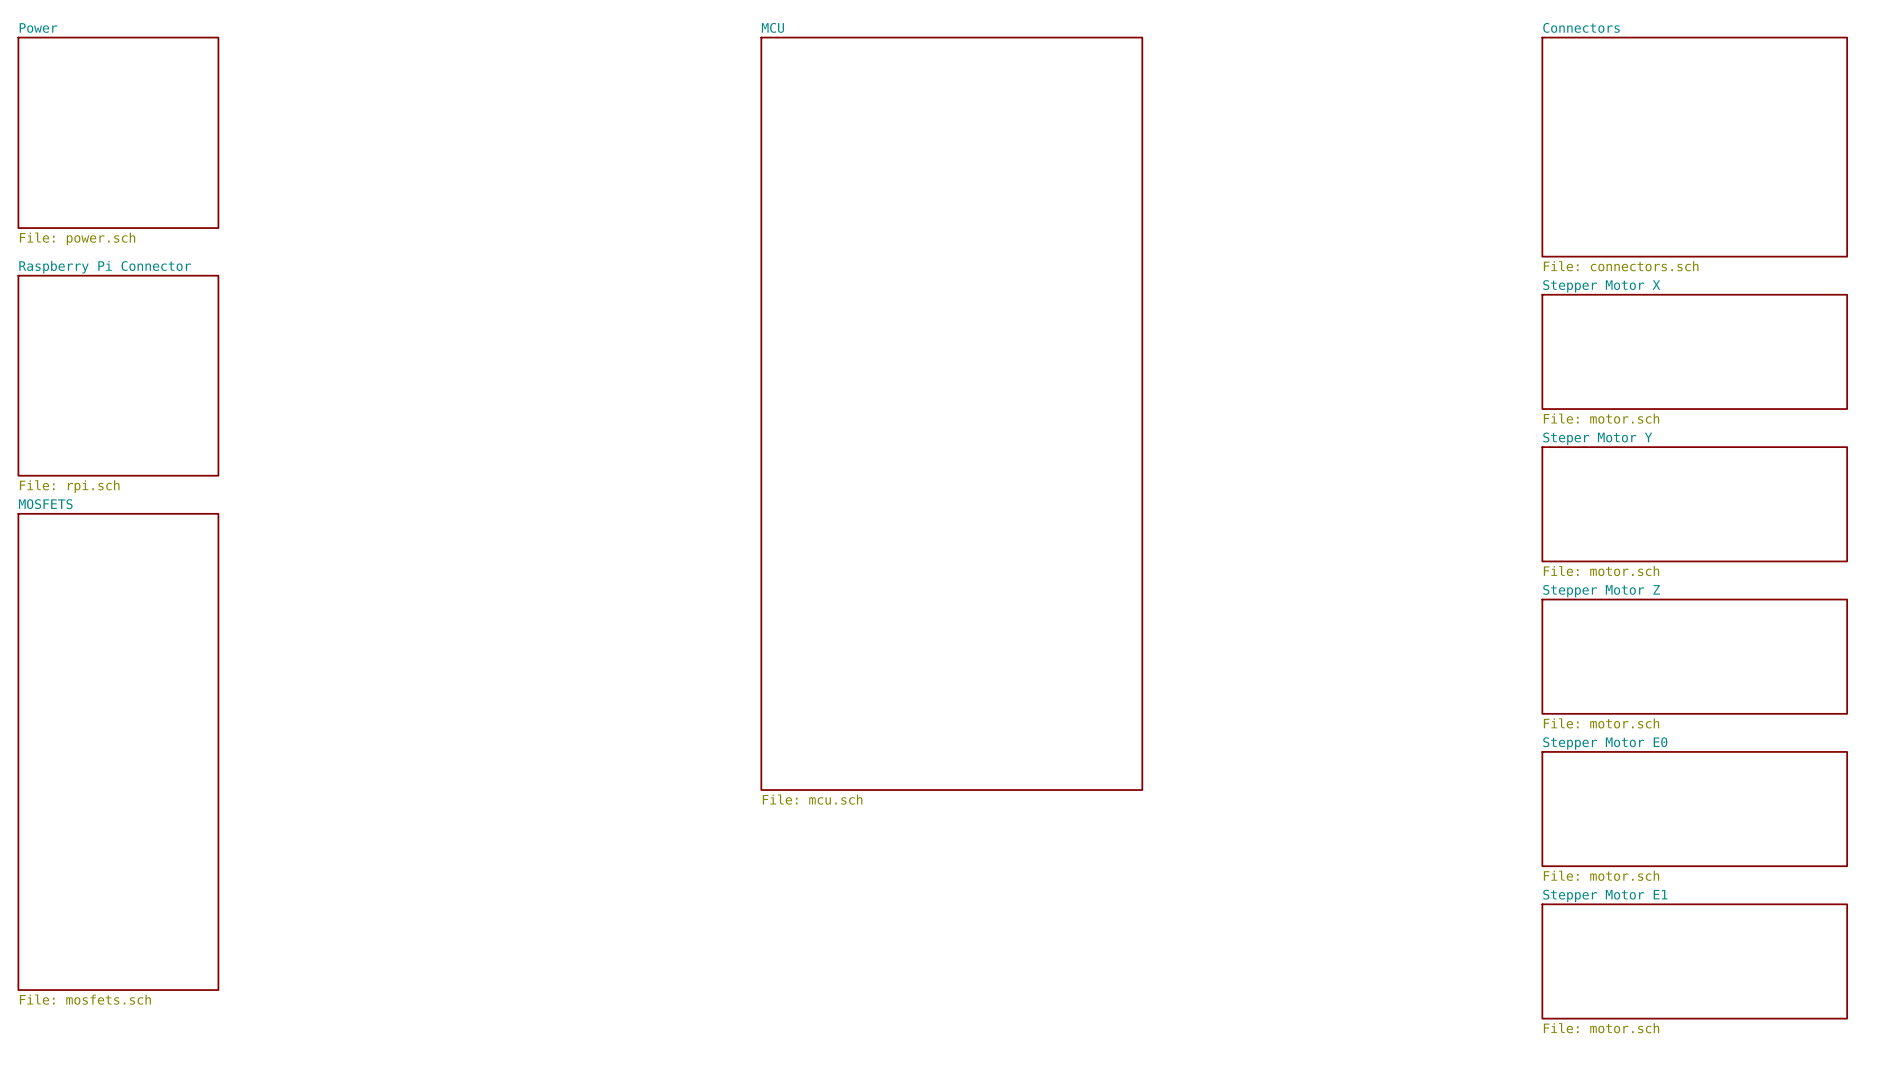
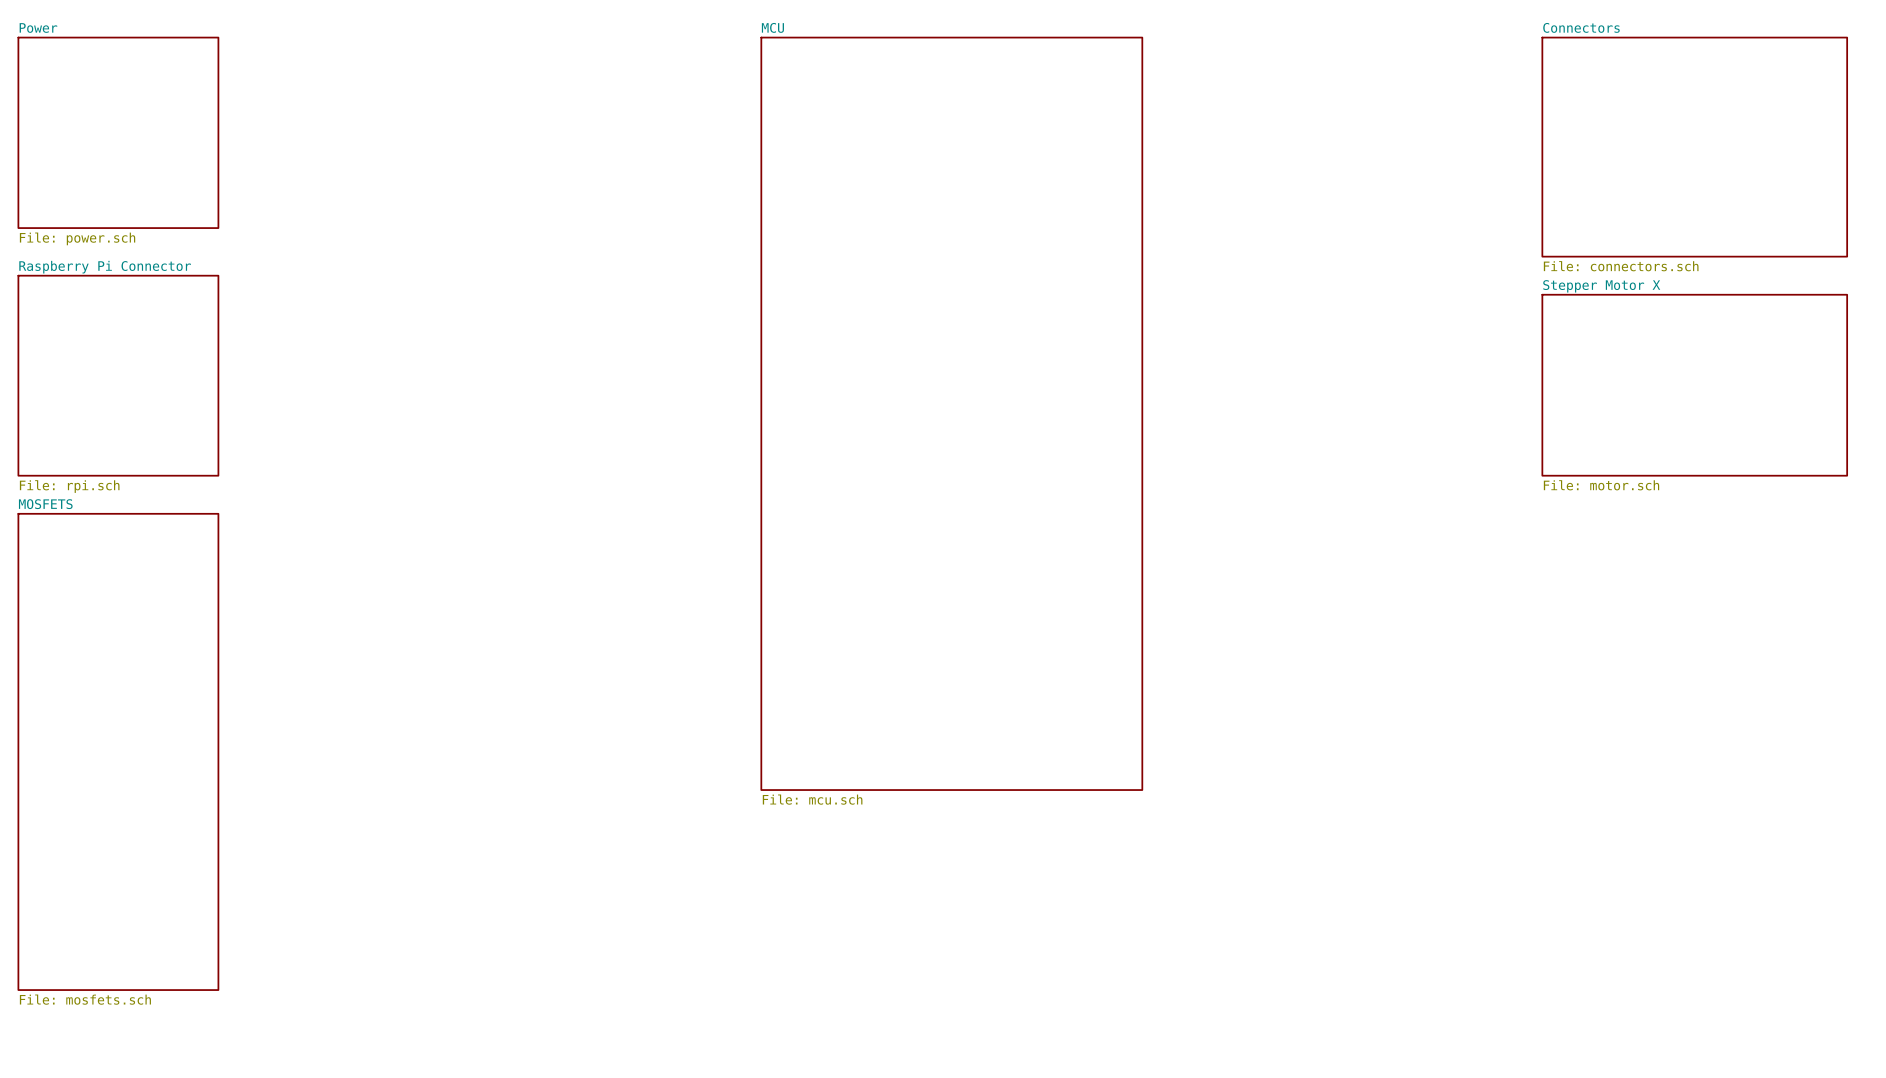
sheet Stepper Motor X: File: motor.sch (1694, 351) -> none
sheet Stepper Motor X: none -> File: motor.sch (1694, 385)
sheet Steper Motor Y: File: motor.sch (1694, 504) -> none
sheet Stepper Motor Z: File: motor.sch (1694, 656) -> none
sheet Stepper Motor E0: File: motor.sch (1694, 809) -> none
sheet Stepper Motor E1: File: motor.sch (1694, 961) -> none

